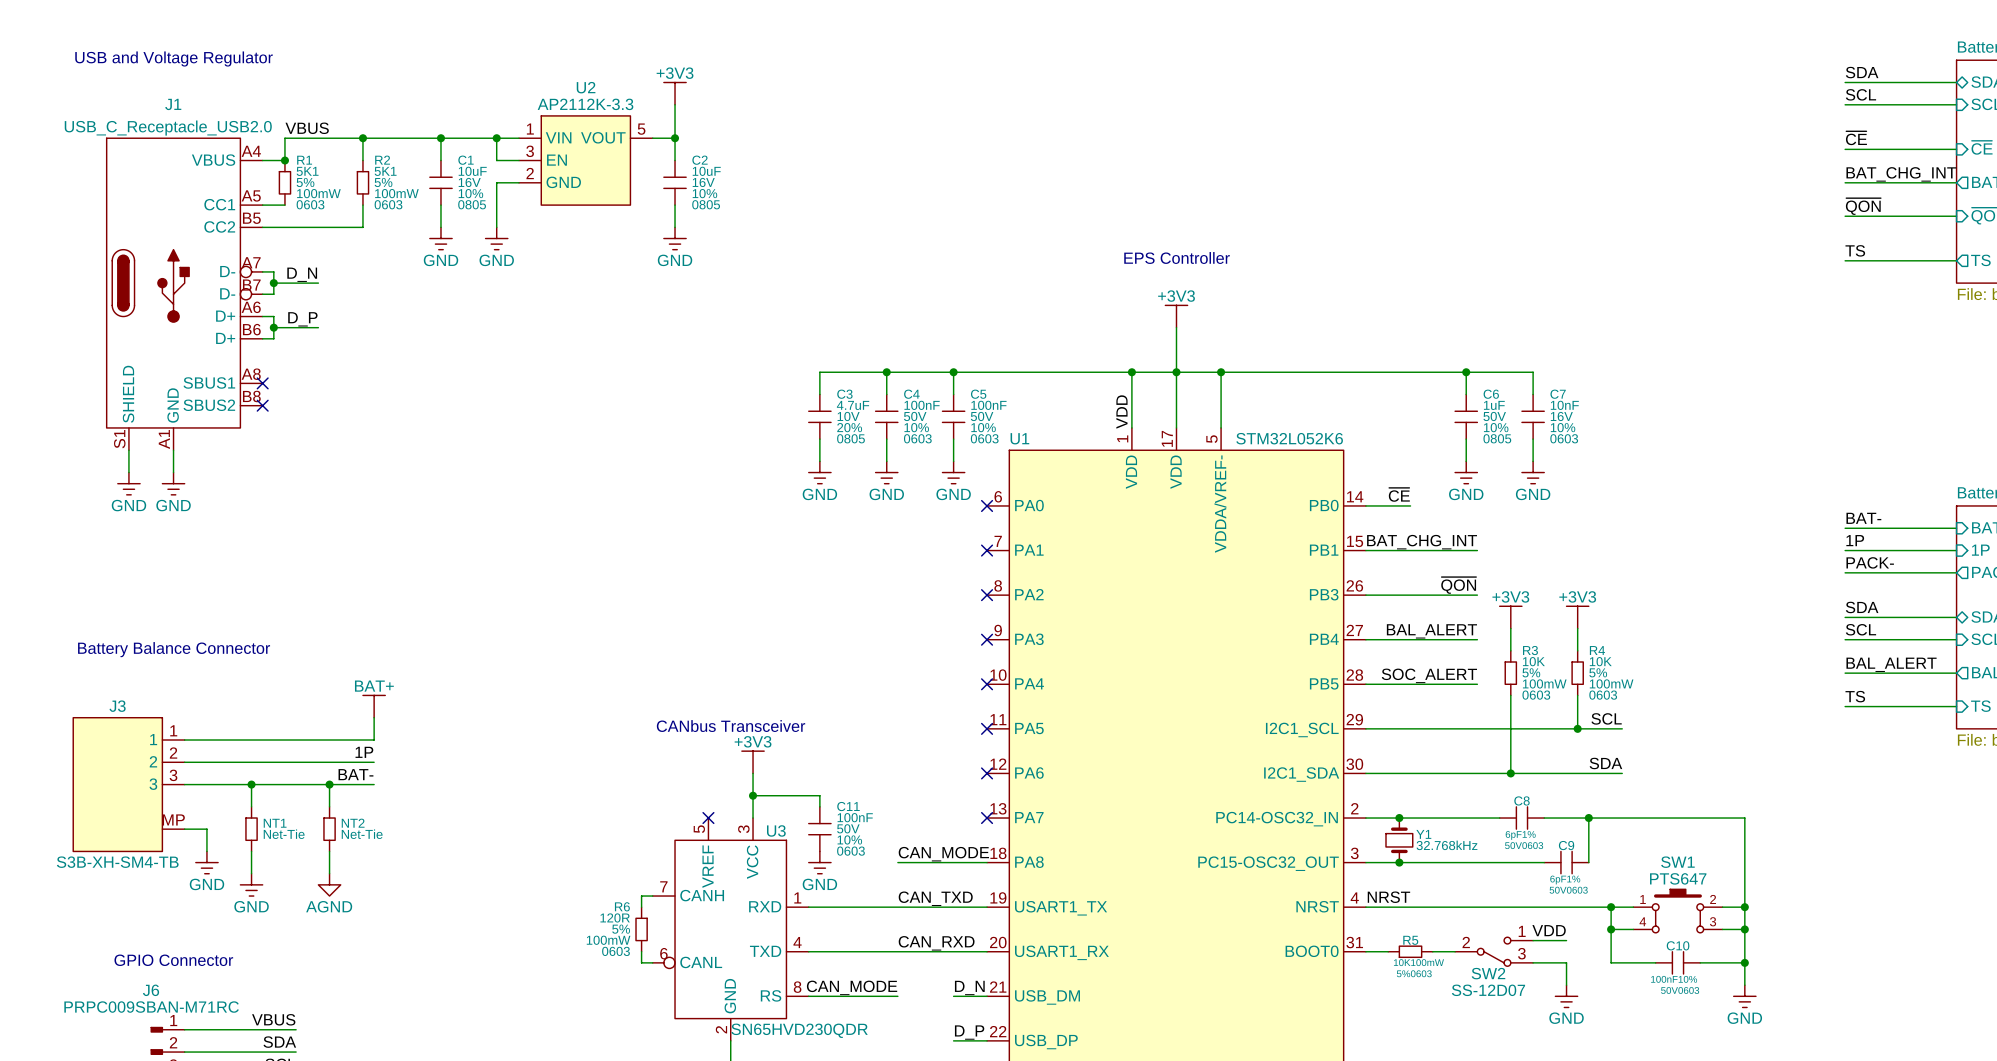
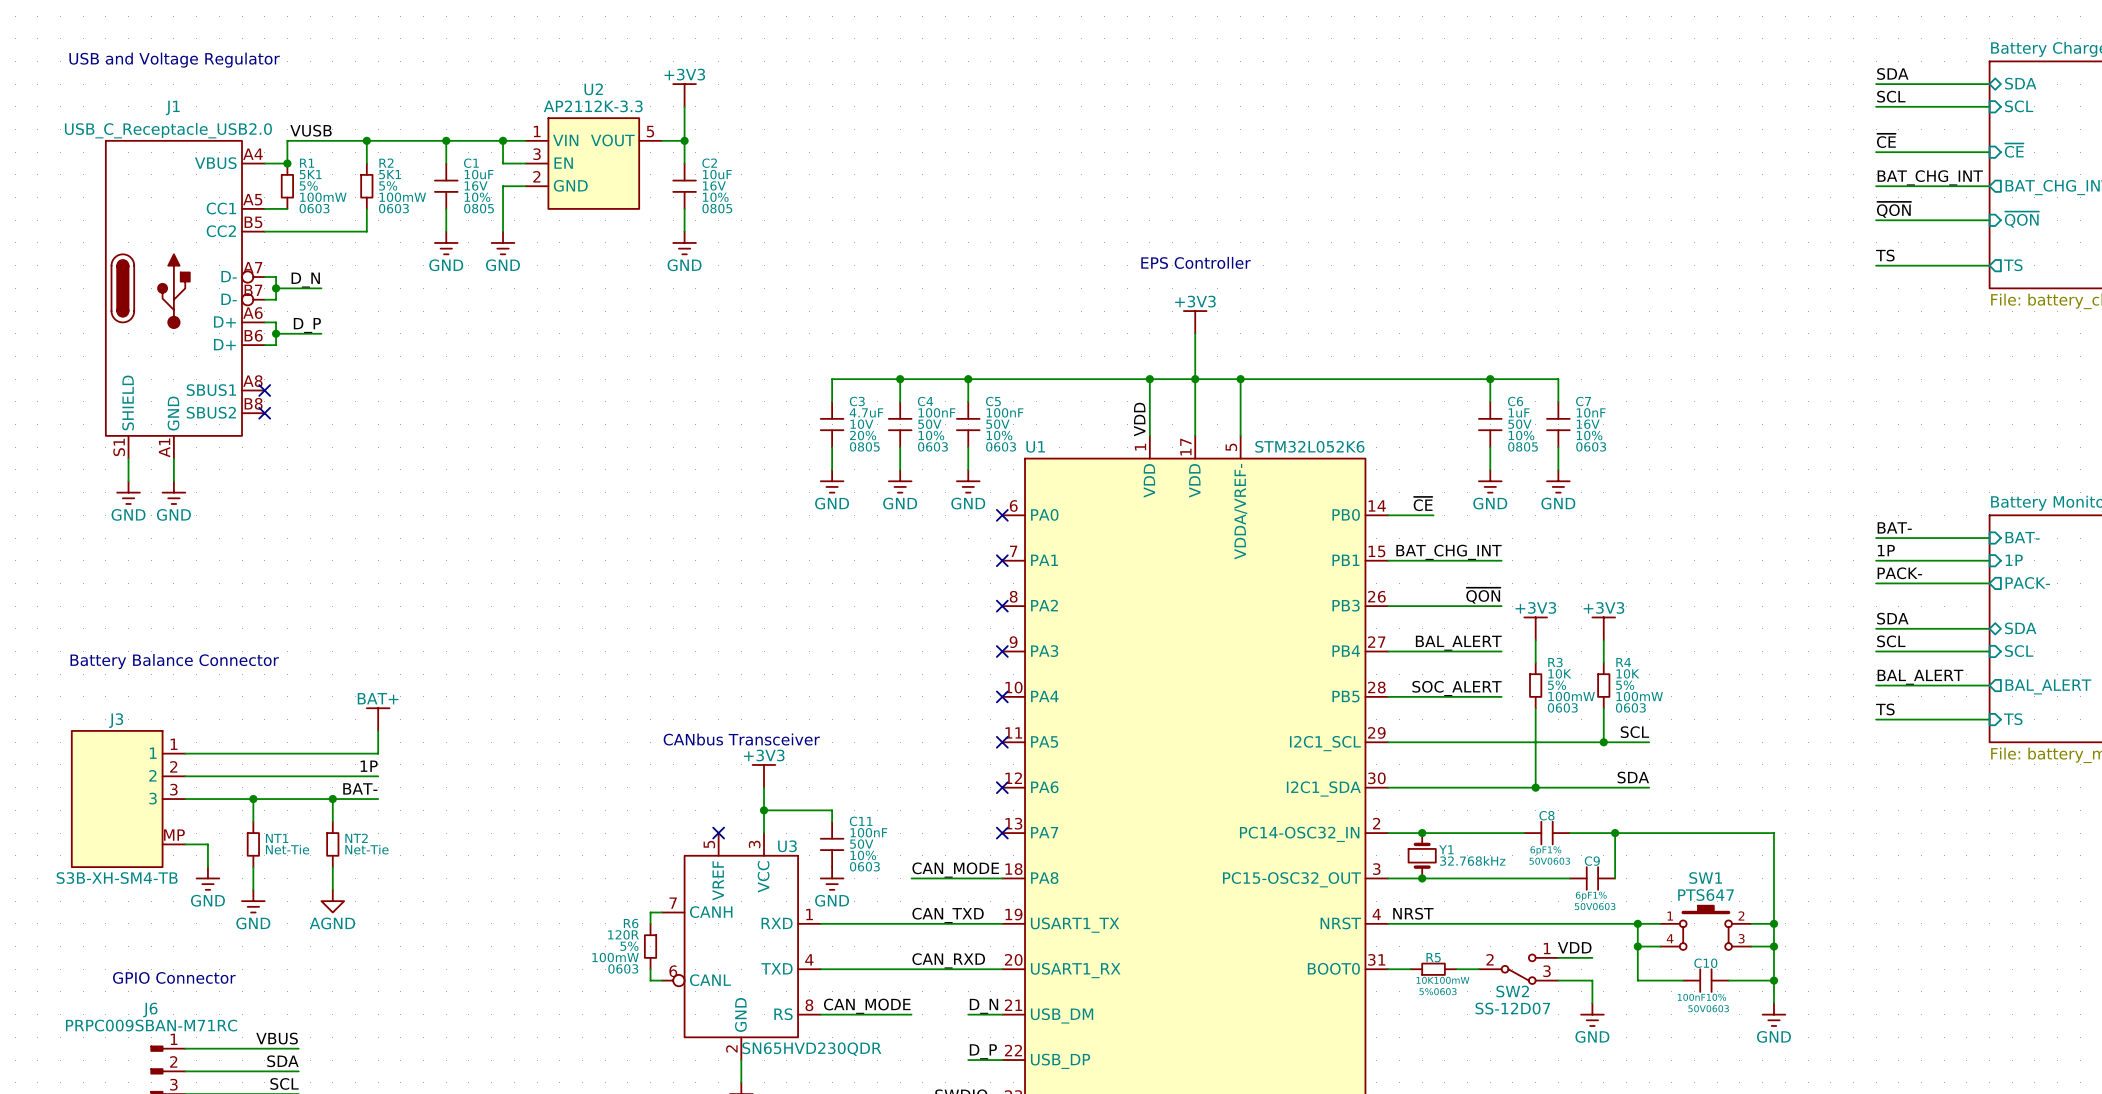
label: VBUS (307, 128) -> VUSB (311, 130)

